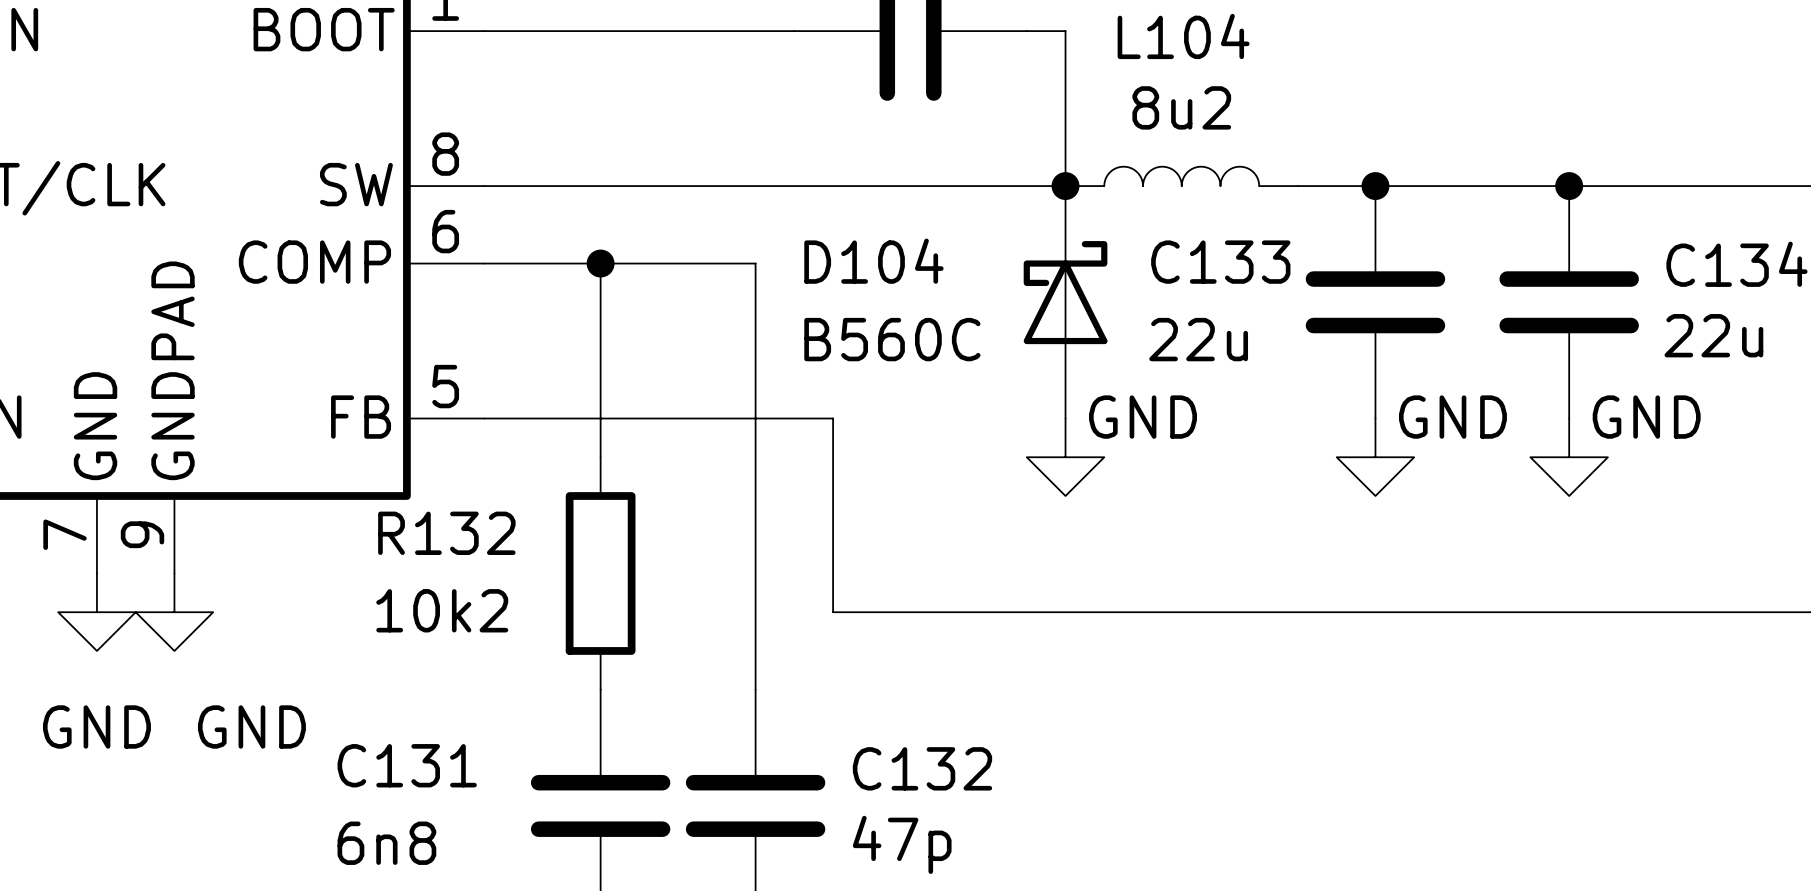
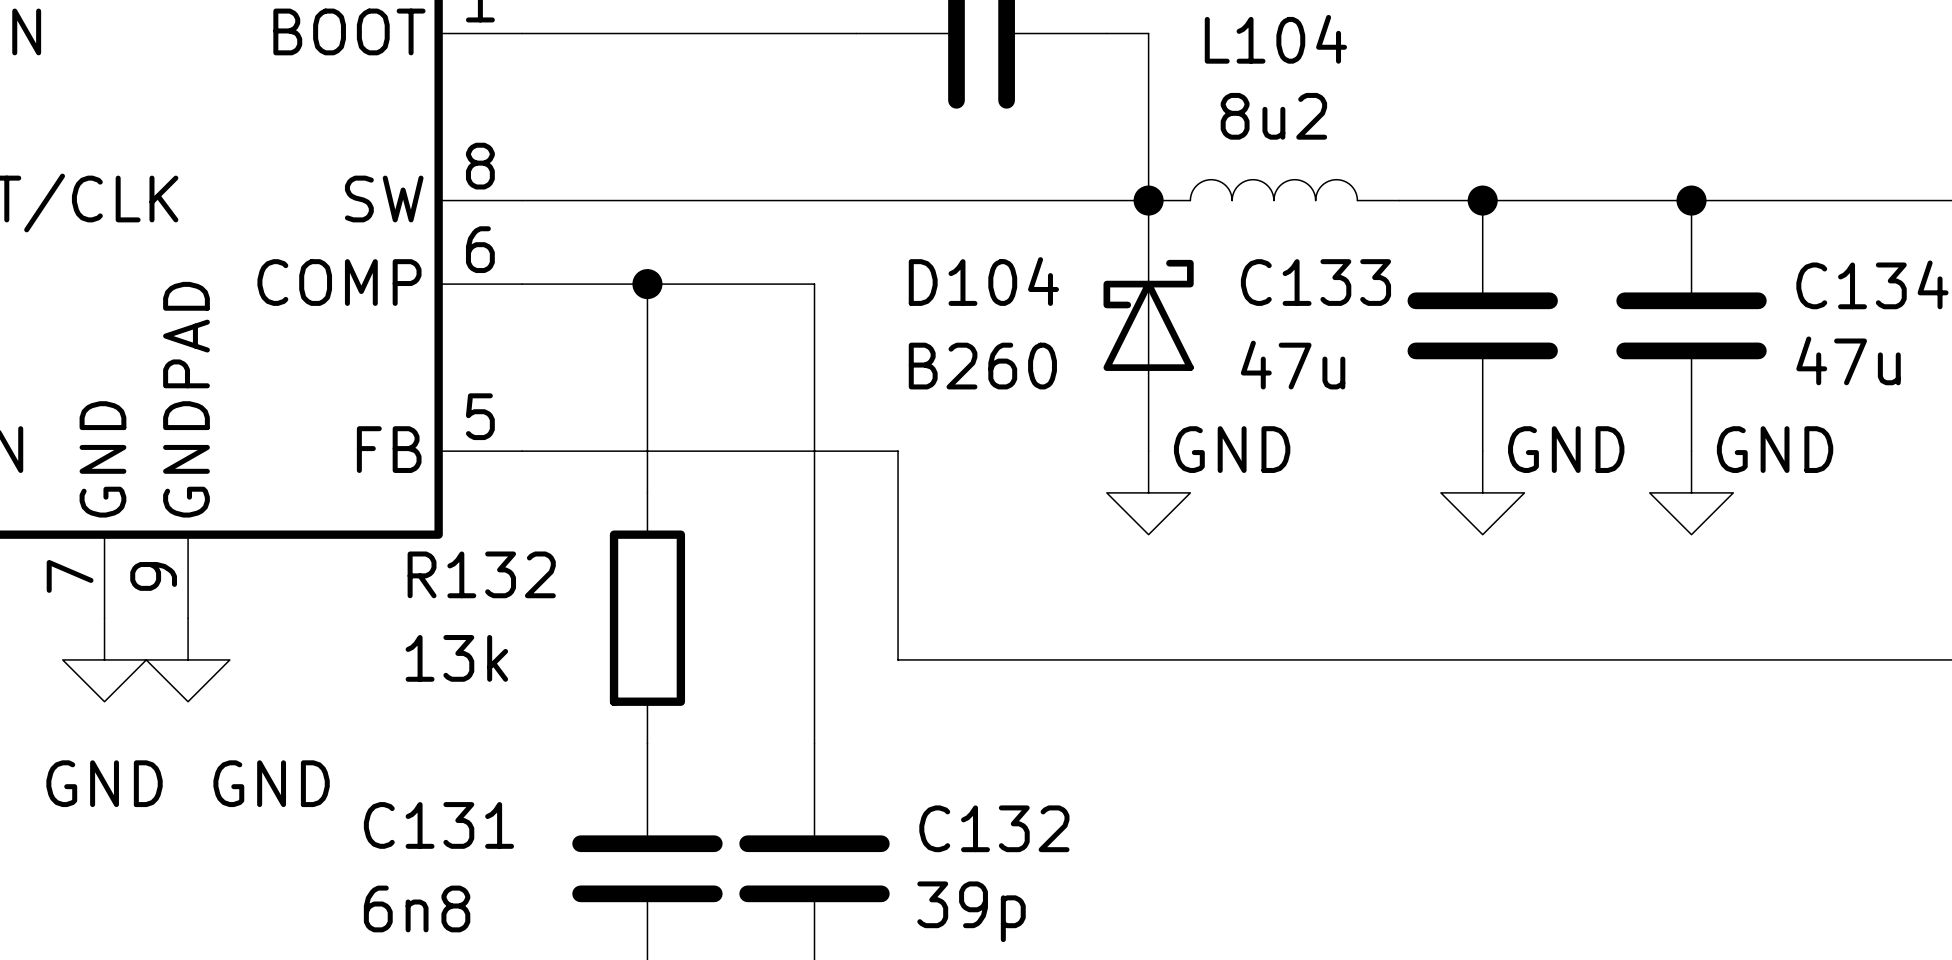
D104 name position: D104 (873, 261) -> D104 (983, 281)
C134 value: 22u (1713, 335) -> 47u (1848, 360)
D104 value: B560C (892, 339) -> B260 (982, 366)
C133 value: 22u (1198, 339) -> 47u (1293, 365)
R132 value: 10k2 (442, 610) -> 13k (456, 658)
C132 value: 47p (902, 844) -> 39p (971, 911)

